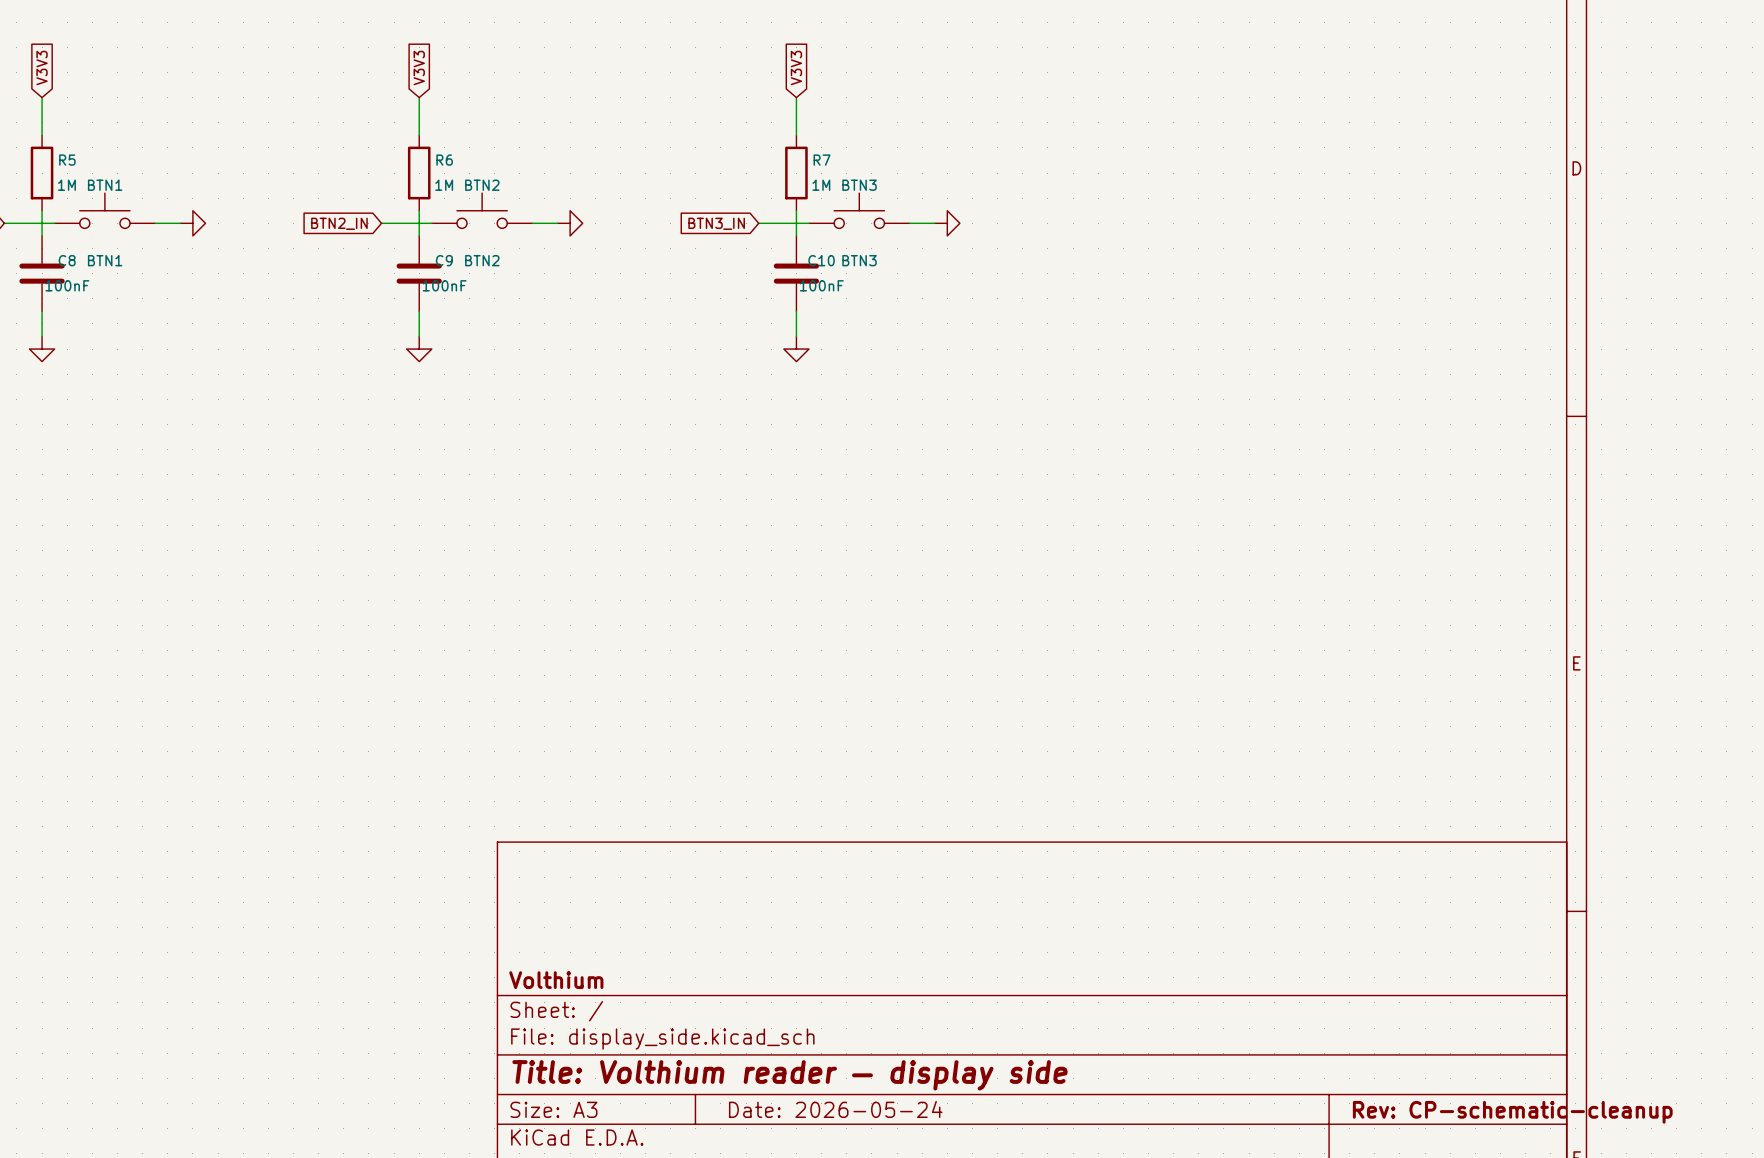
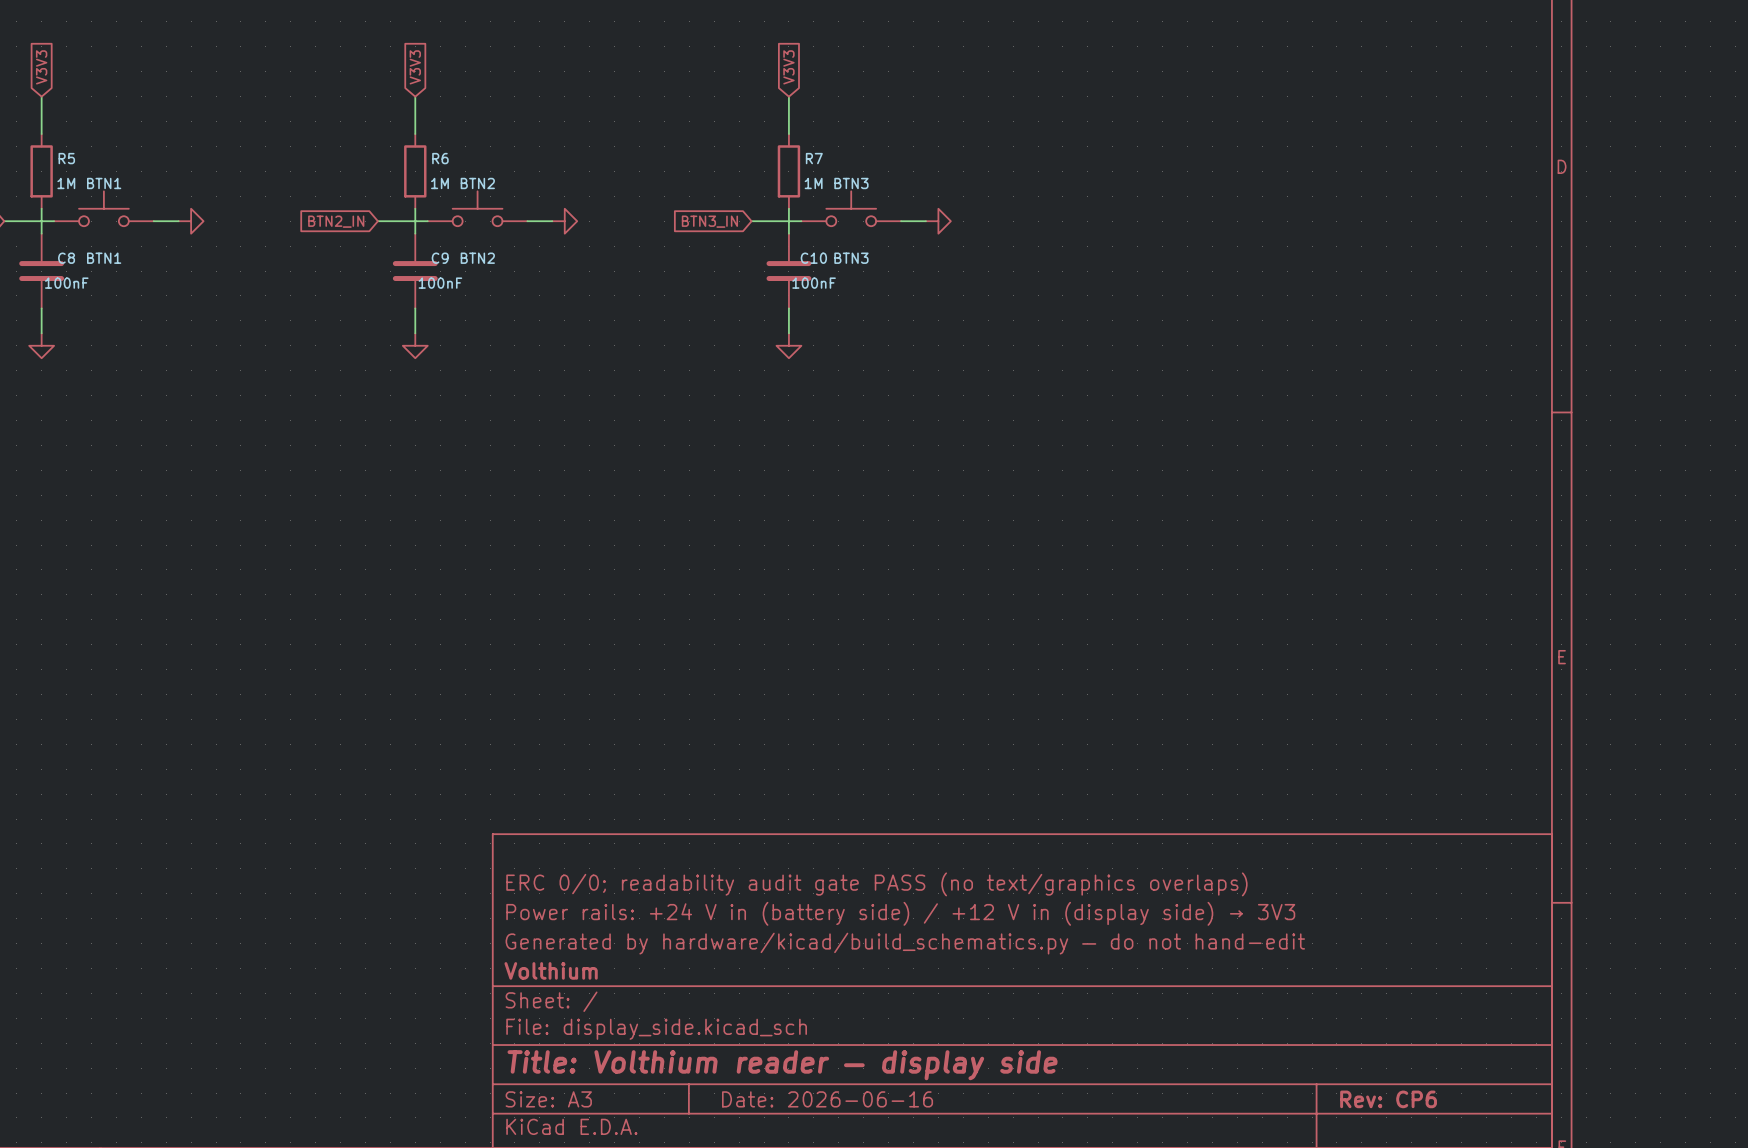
title block: none -> ERC 0/0; readability audit gate PASS (no text/graphics overlaps) (876, 884)
title block: none -> Power rails: +24 V in (battery side) / +12 V in (display side) → 3V3 (900, 913)
title block: none -> Generated by hardware/kicad/build_schematics.py — do not hand-edit (905, 943)
title block: Date: 2026-05-24 (835, 1109) -> Date: 2026-06-16 (827, 1099)
title block: Rev: CP-schematic-cleanup (1512, 1112) -> Rev: CP6 (1388, 1099)

